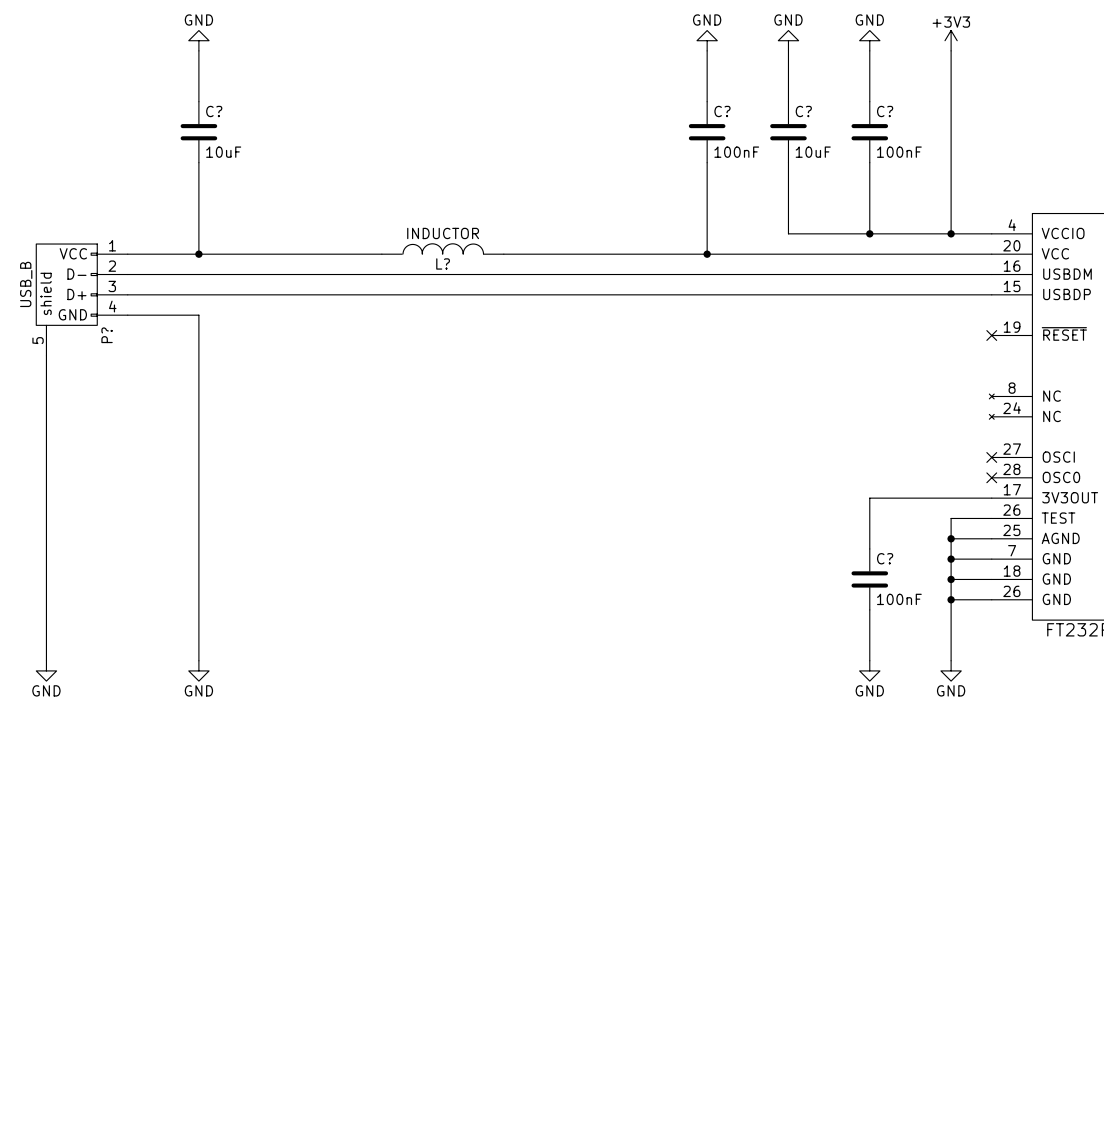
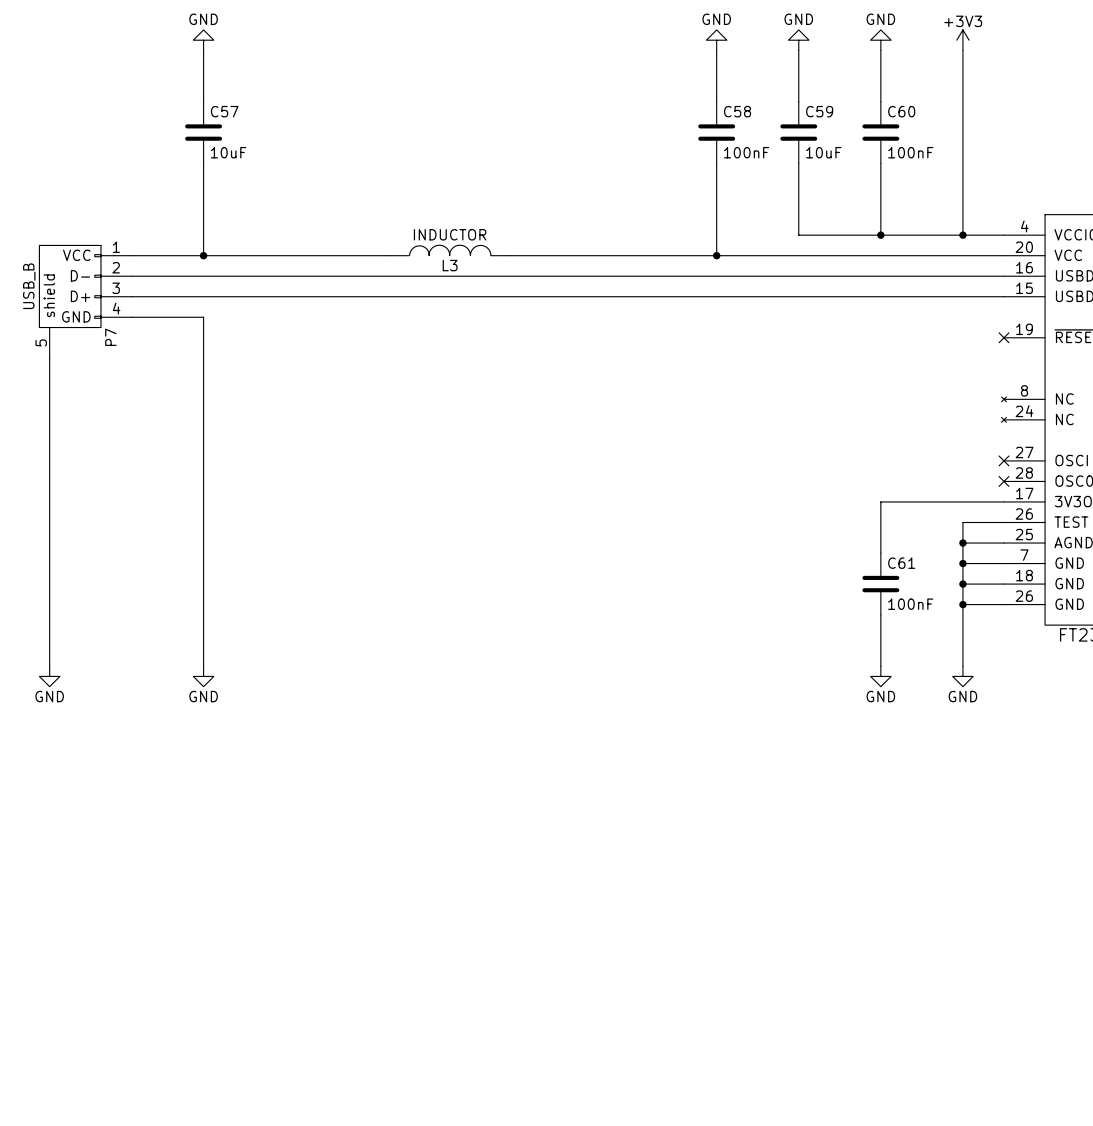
C? name: C? (214, 111) -> C57 (224, 111)
C? name: C? (722, 111) -> C58 (737, 111)
C? name: C? (803, 111) -> C59 (819, 111)
C? name: C? (885, 111) -> C60 (901, 111)
L? name: L? (443, 263) -> L3 (450, 265)
P? name: P? (107, 335) -> P7 (110, 337)
C? name: C? (885, 558) -> C61 (901, 563)

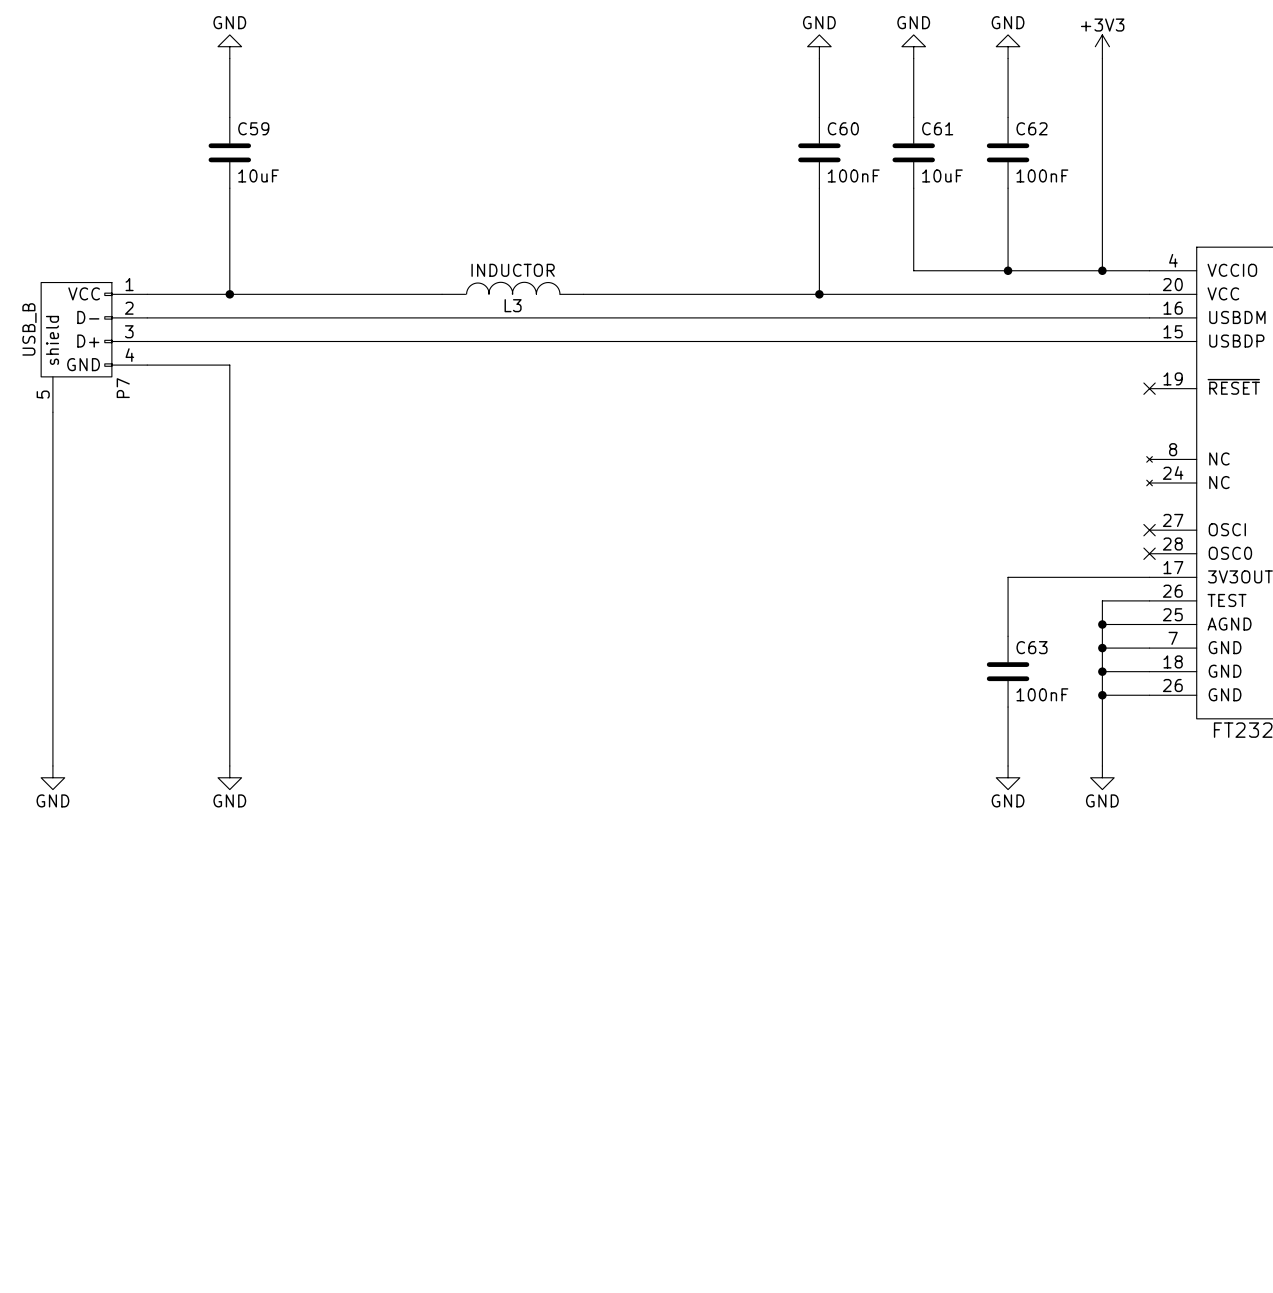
C57 name: C57 (224, 111) -> C59 (253, 128)
C58 name: C58 (737, 111) -> C60 (843, 128)
C59 name: C59 (819, 111) -> C61 (937, 128)
C60 name: C60 (901, 111) -> C62 (1032, 128)
C61 name: C61 (901, 563) -> C63 (1032, 647)

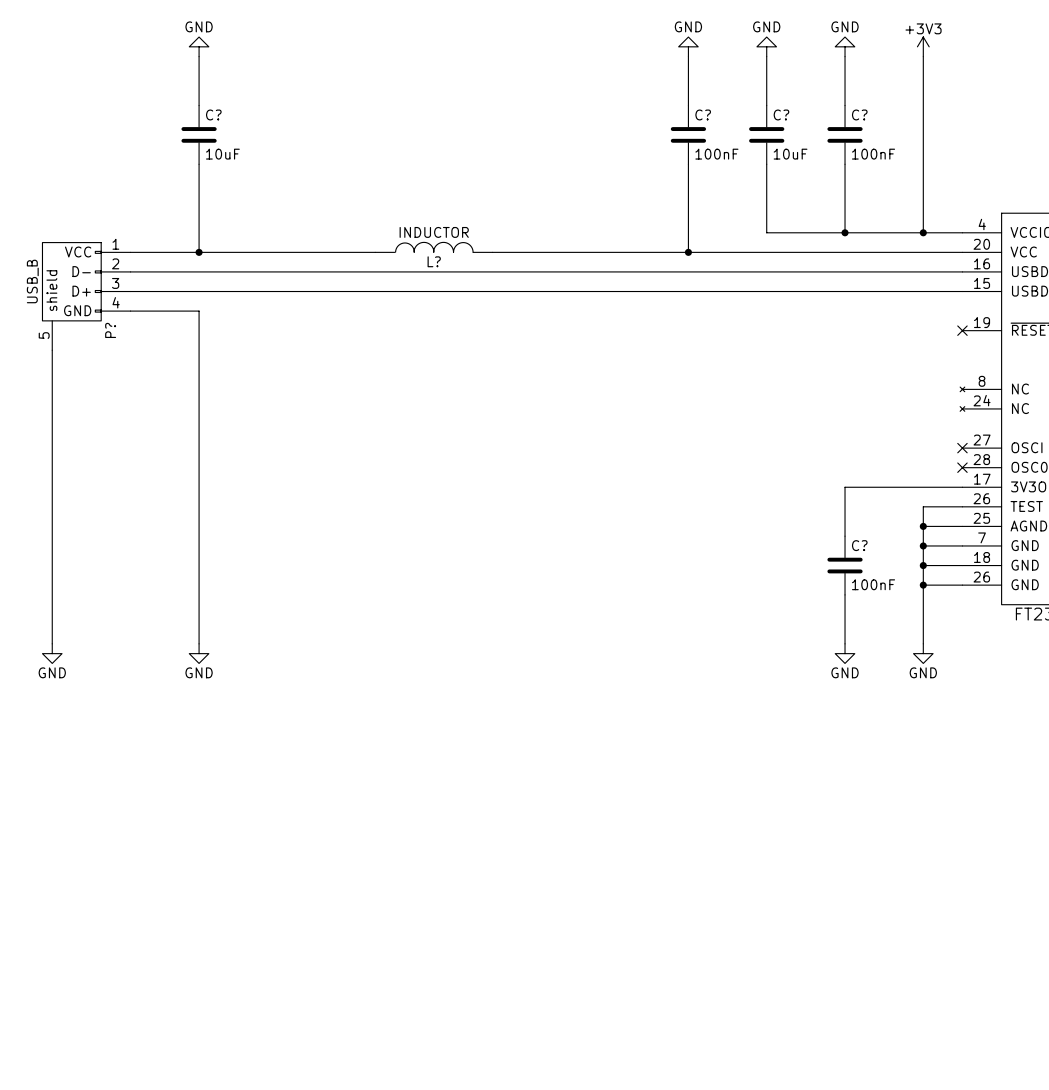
C59 name: C59 (253, 128) -> C? (213, 114)
C60 name: C60 (843, 128) -> C? (703, 114)
C61 name: C61 (937, 128) -> C? (781, 114)
C62 name: C62 (1032, 128) -> C? (859, 114)
L3 name: L3 (513, 305) -> L? (434, 261)
P7 name: P7 (123, 388) -> P? (110, 330)
C63 name: C63 (1032, 647) -> C? (859, 545)

